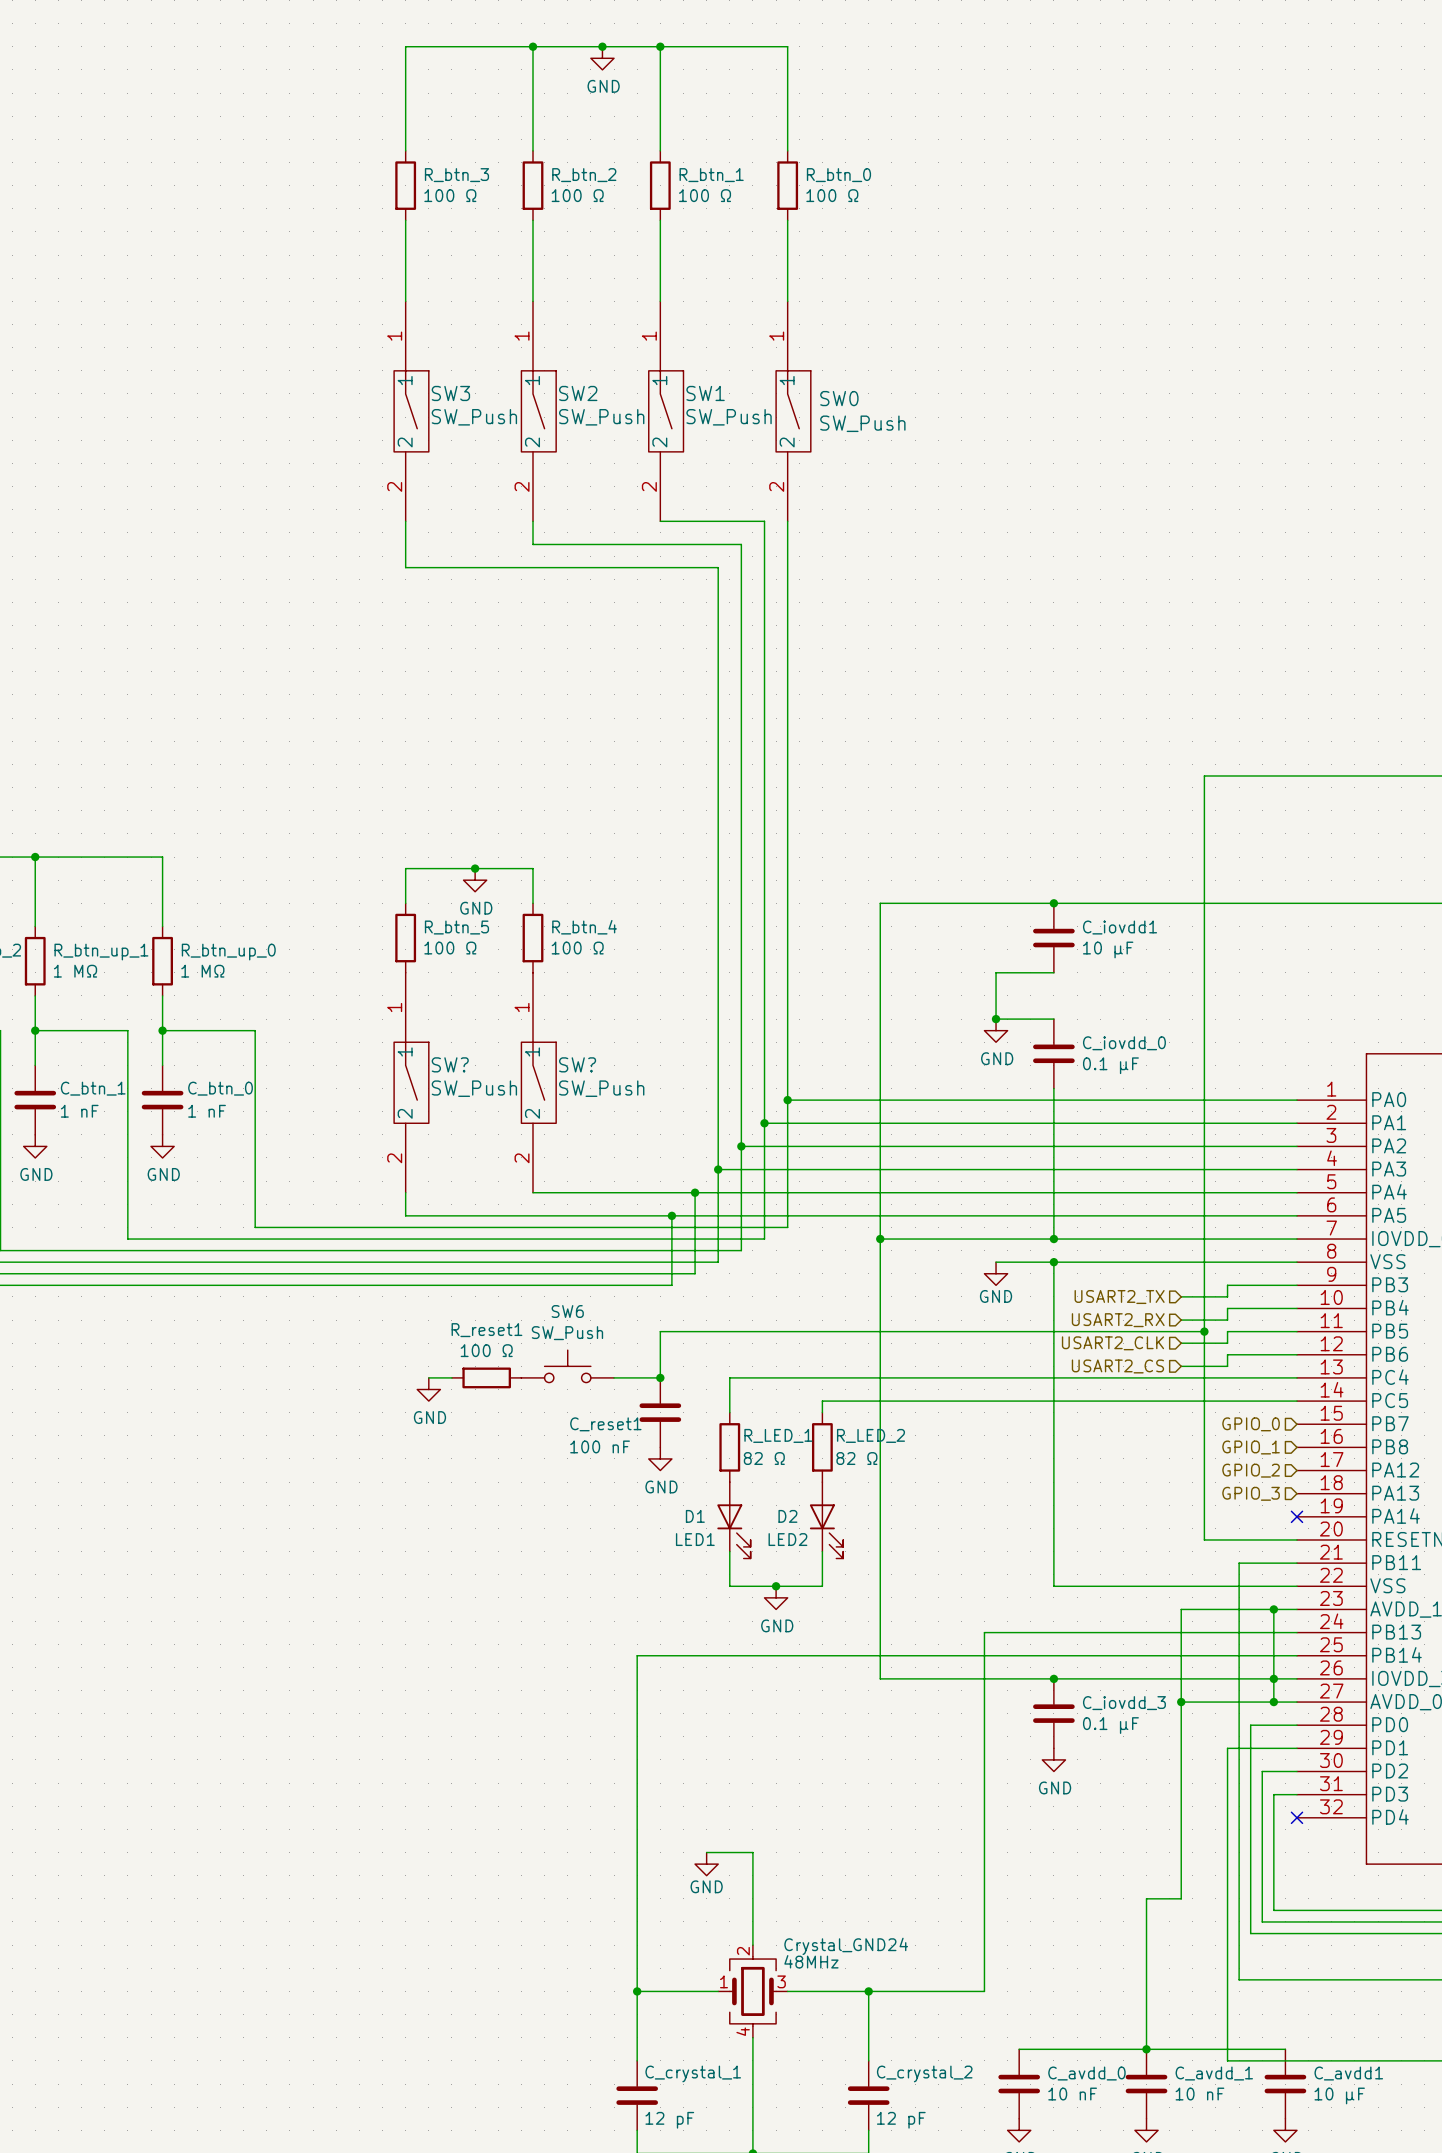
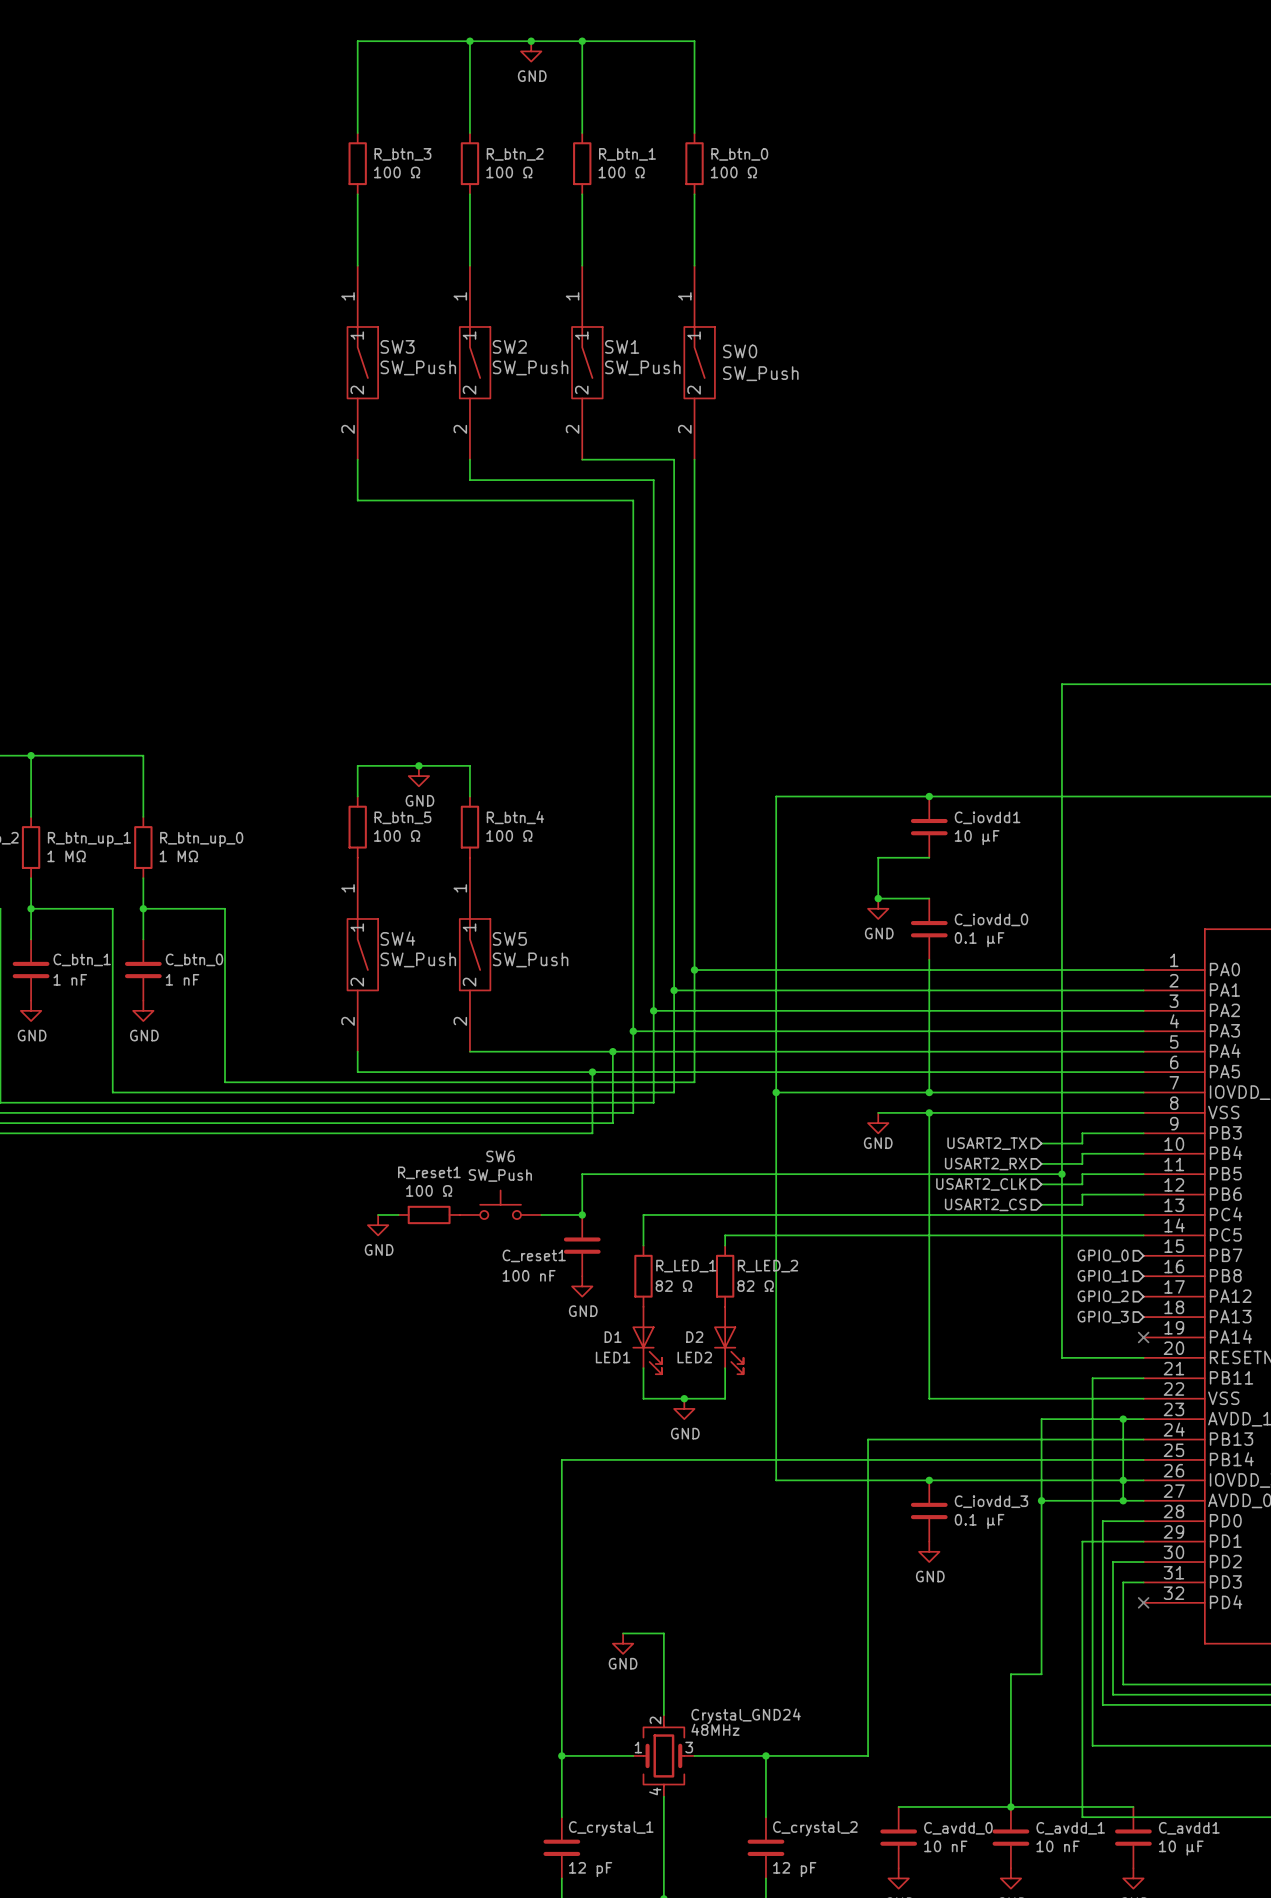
SW? name: SW? (450, 1064) -> SW4 (397, 938)
SW? name: SW? (577, 1064) -> SW5 (509, 938)

